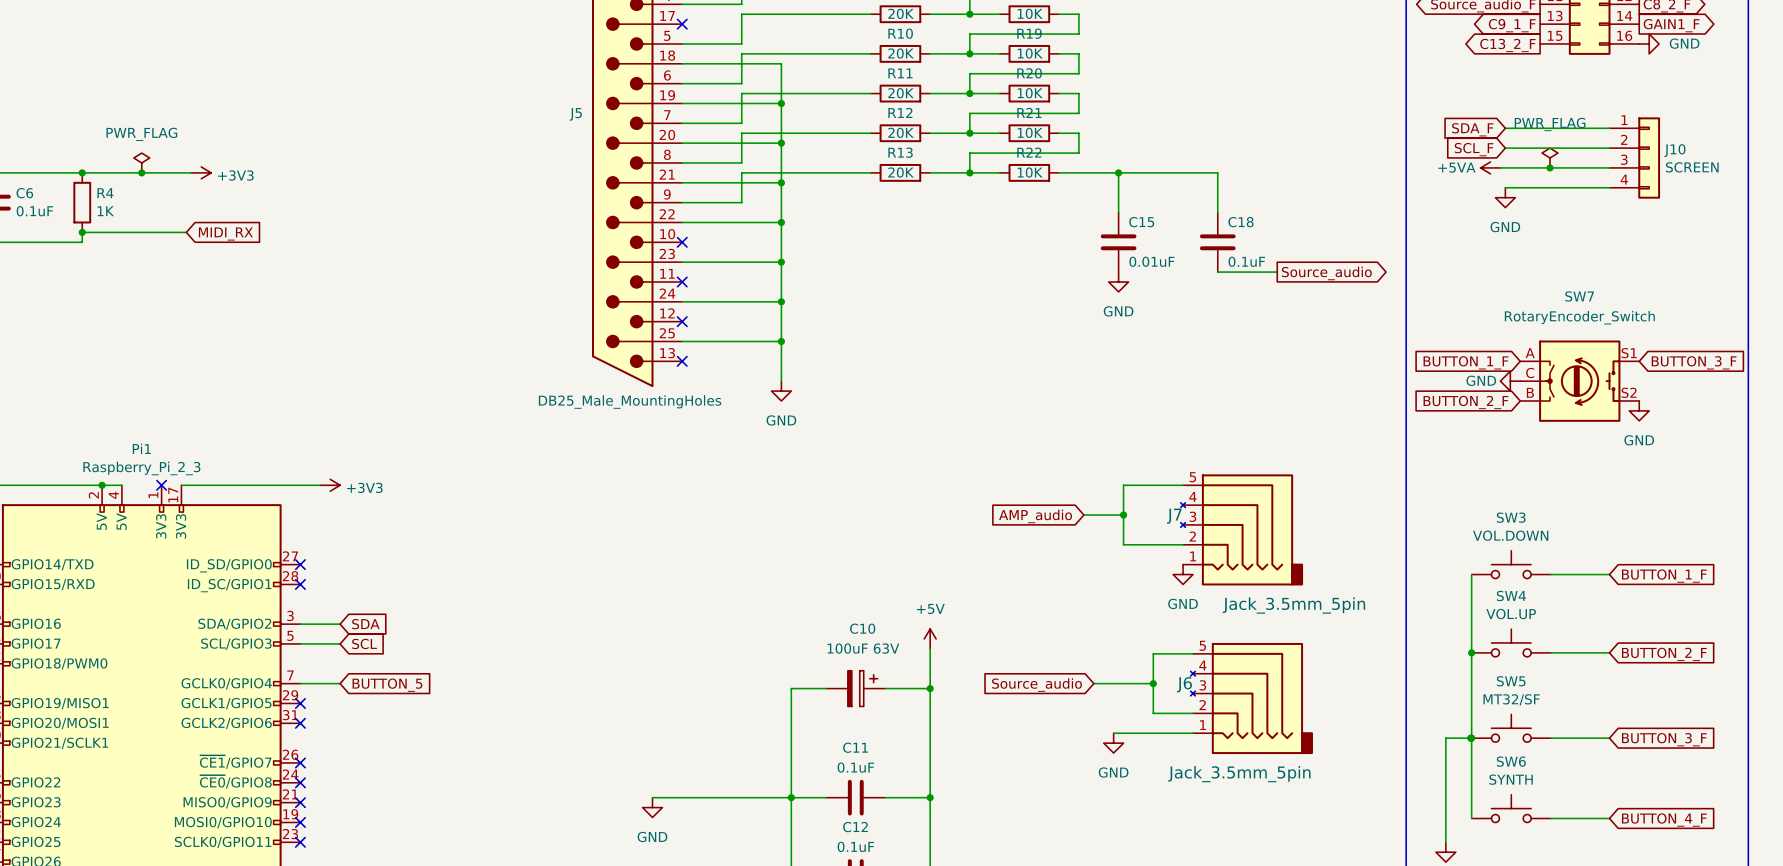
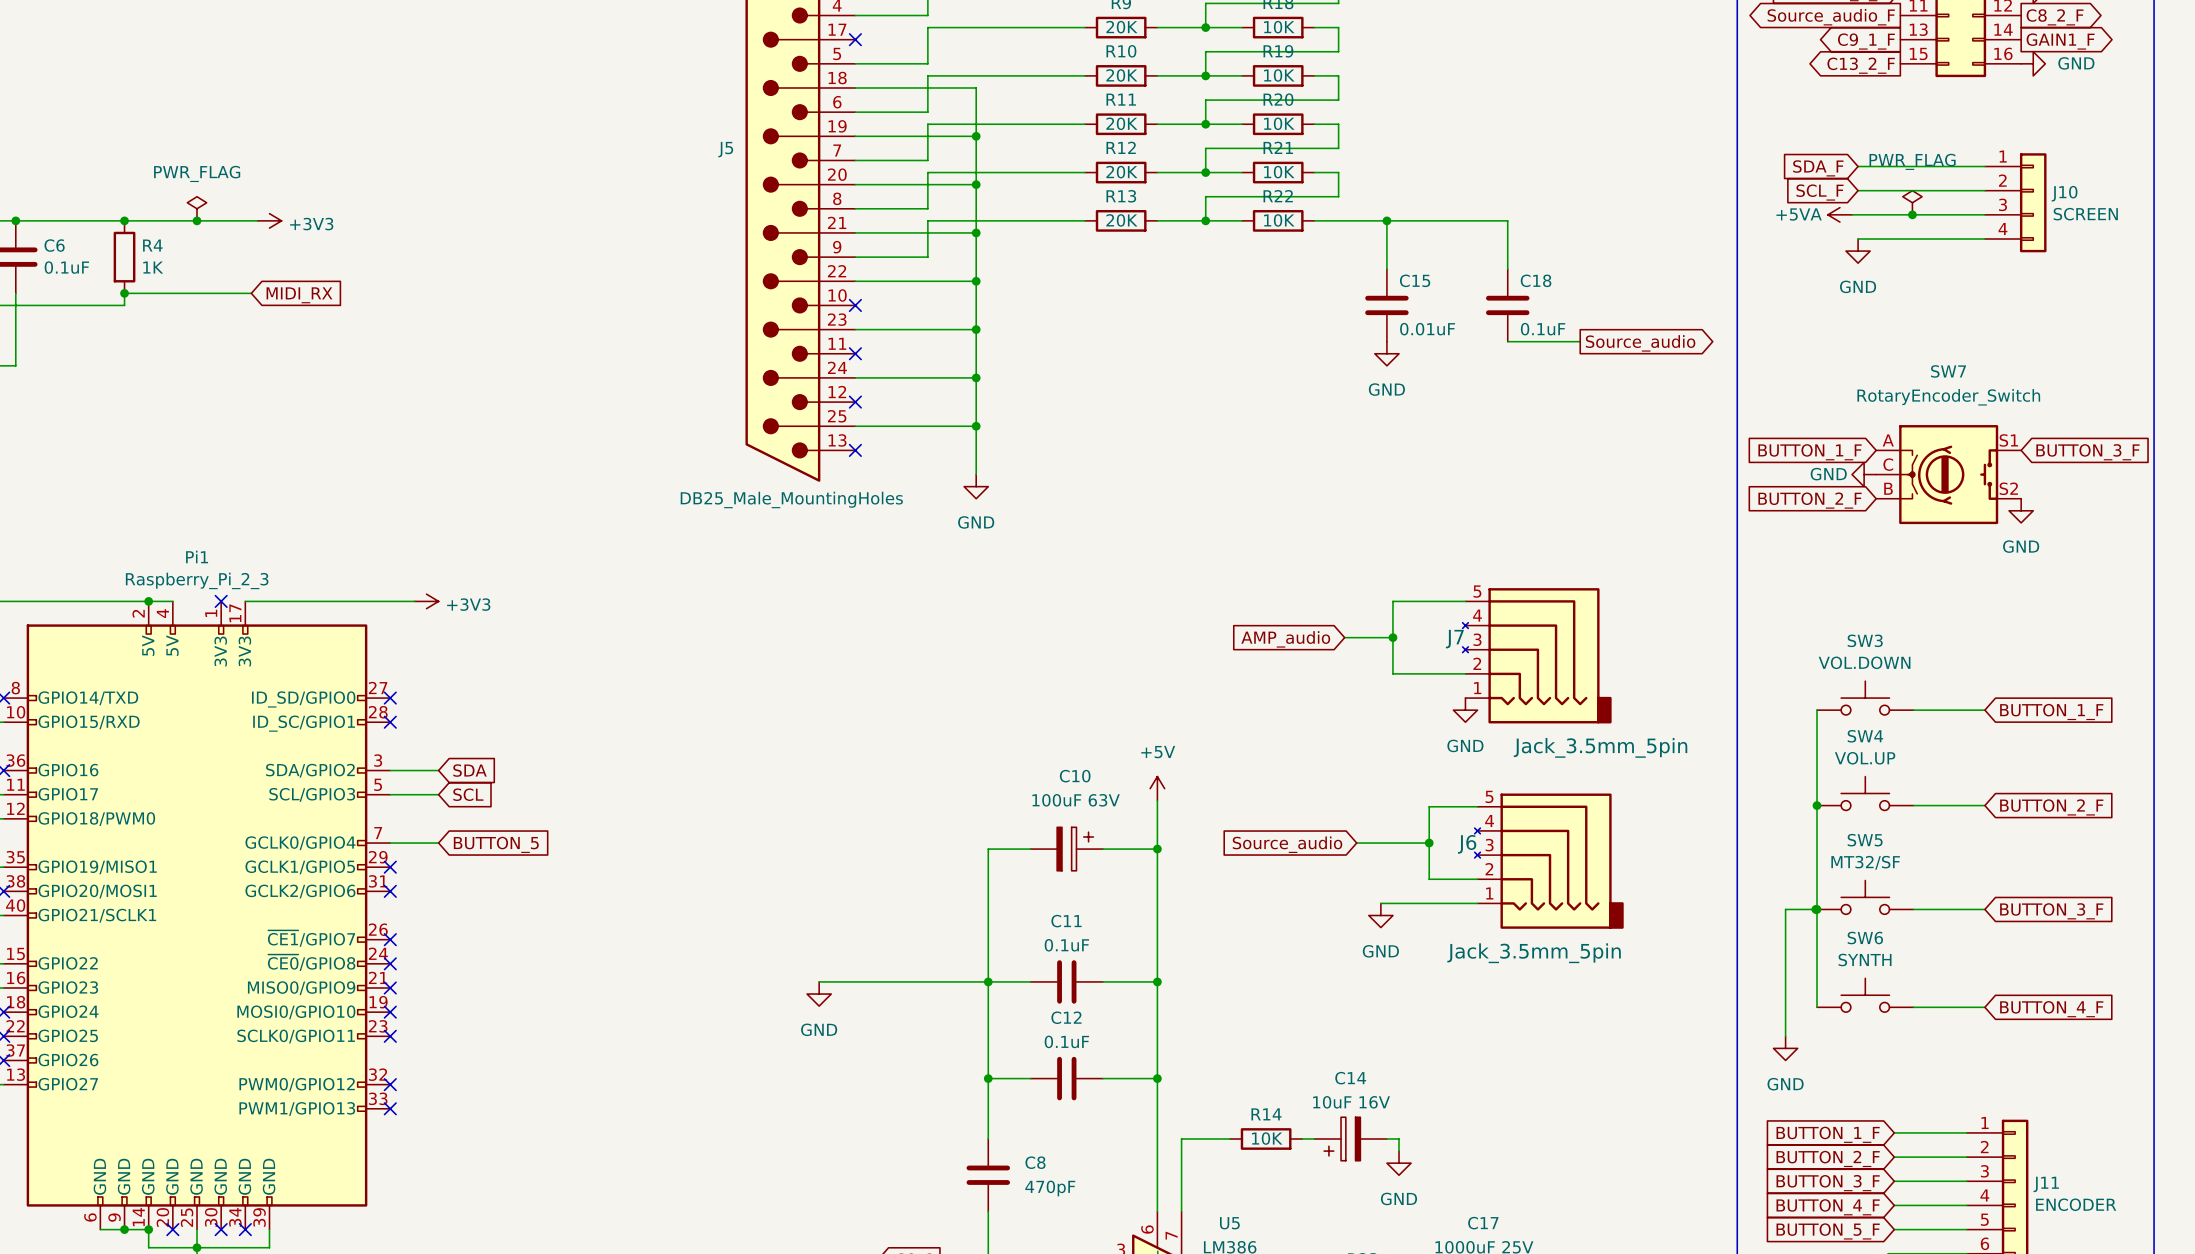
SW7 symbol: [1520, 340, 1640, 422] -> [1876, 425, 2022, 525]

